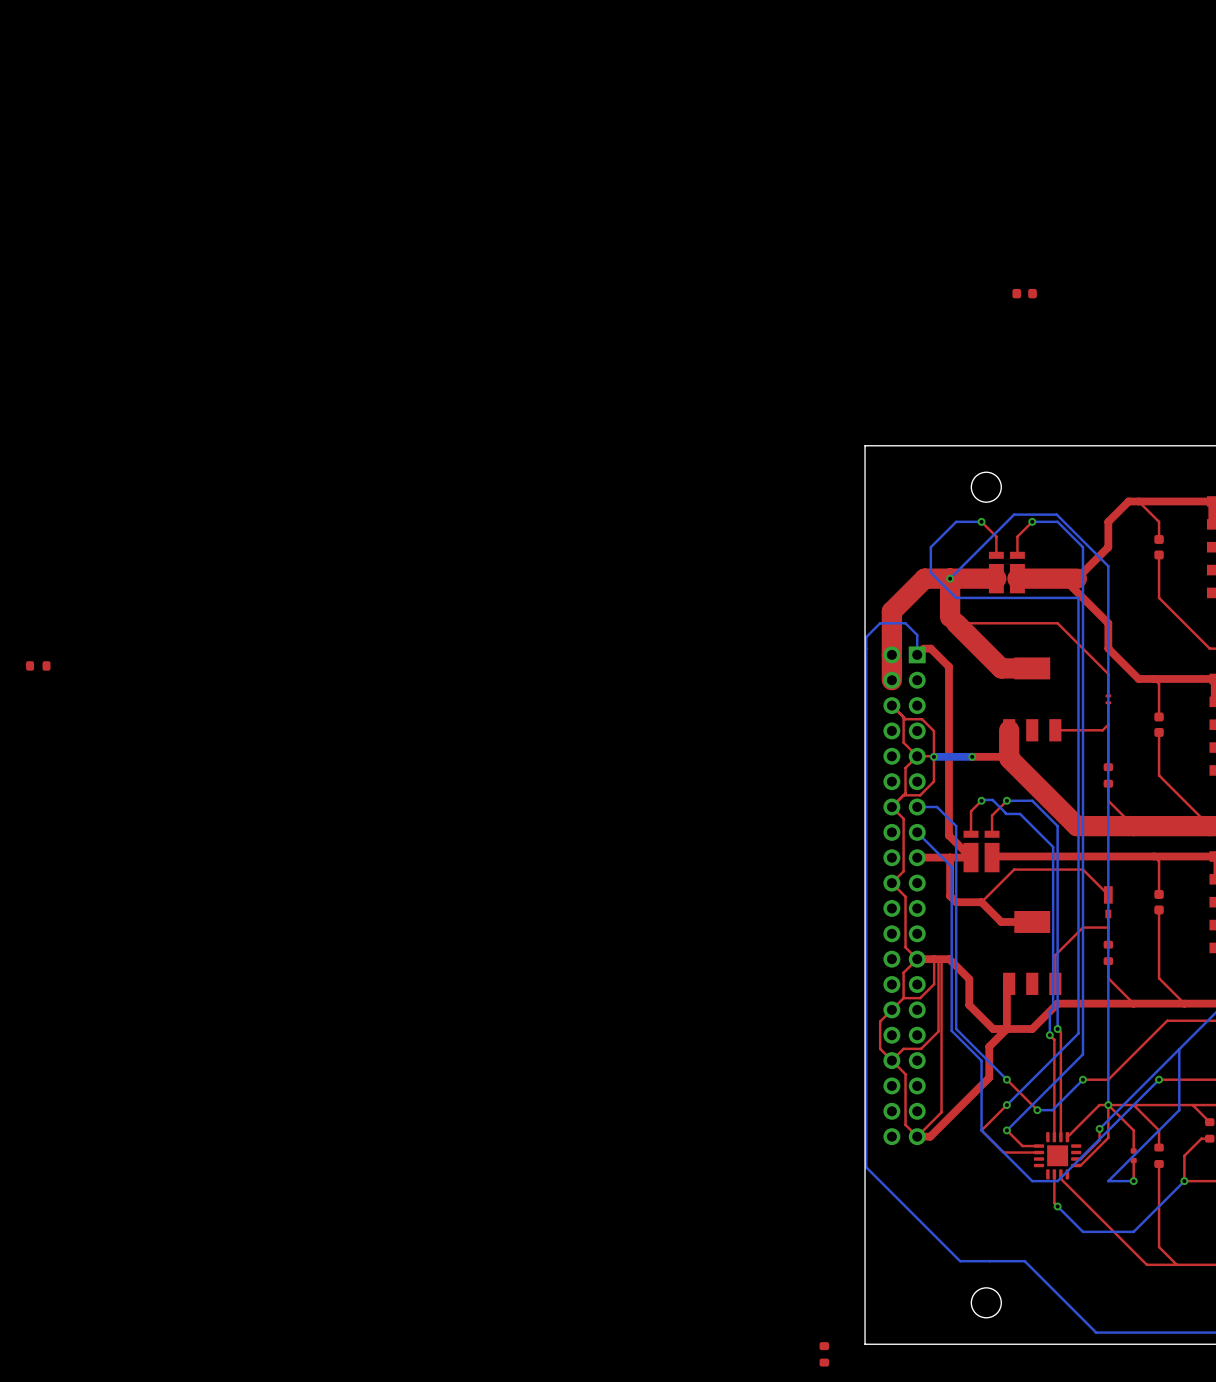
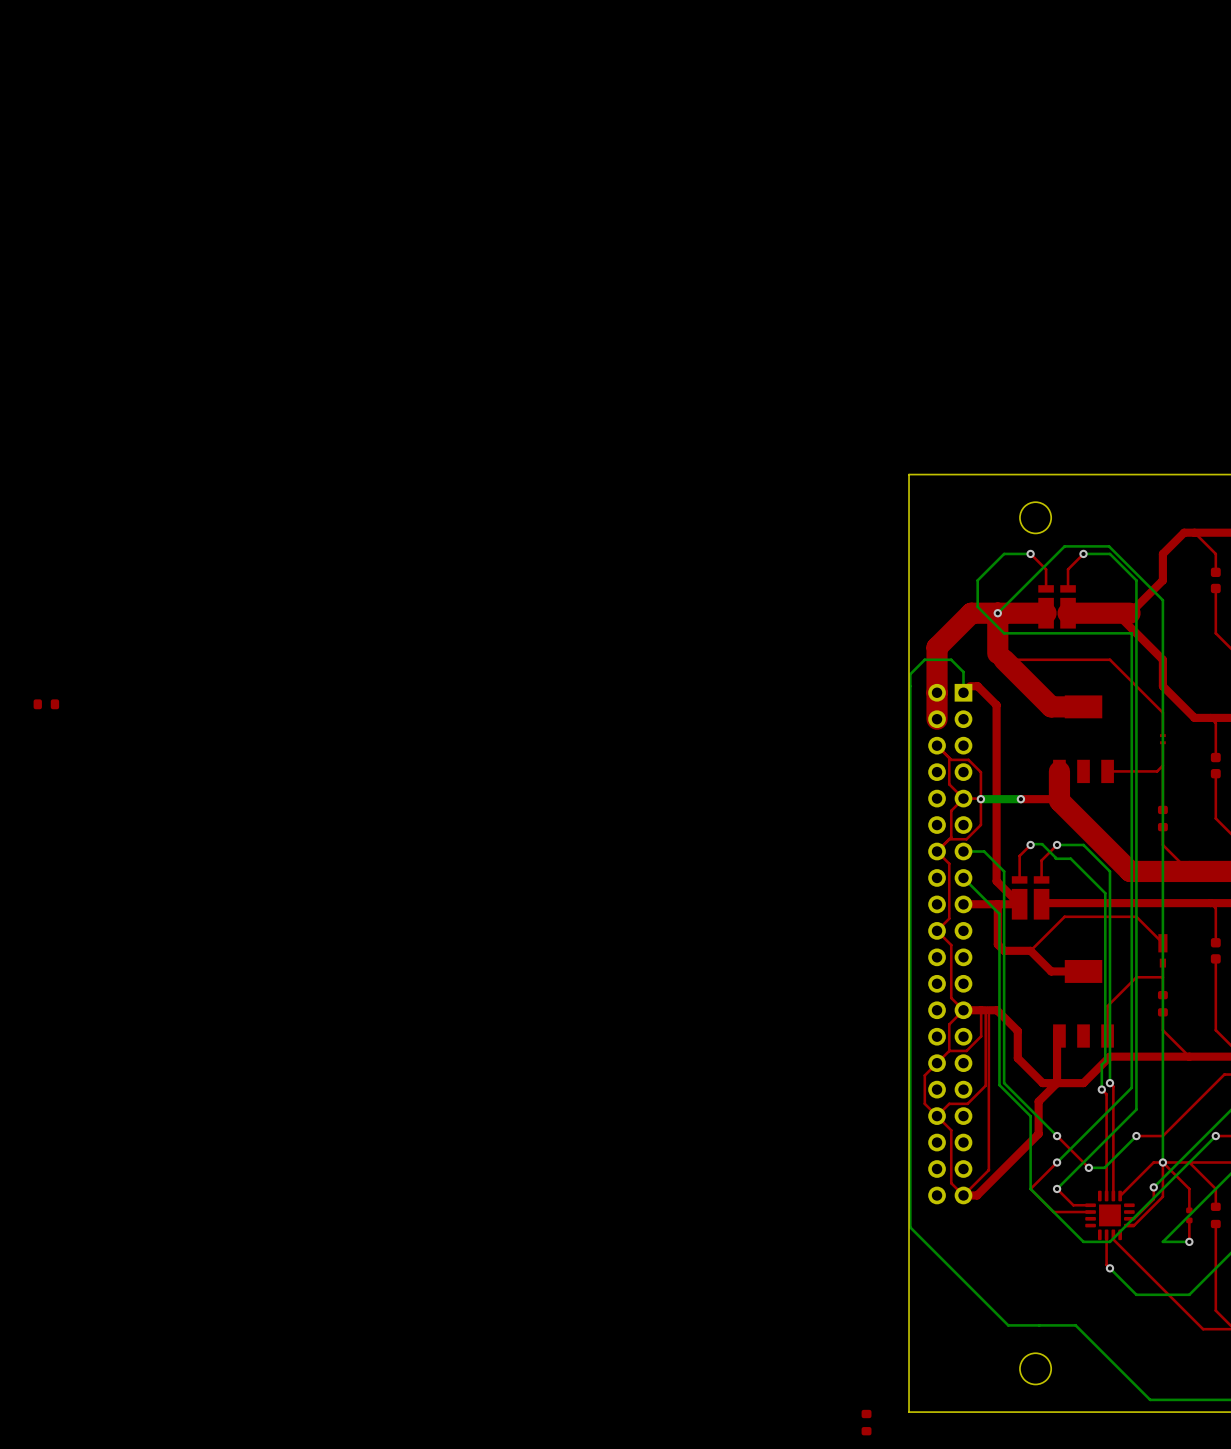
part: (1024, 293) -> none

